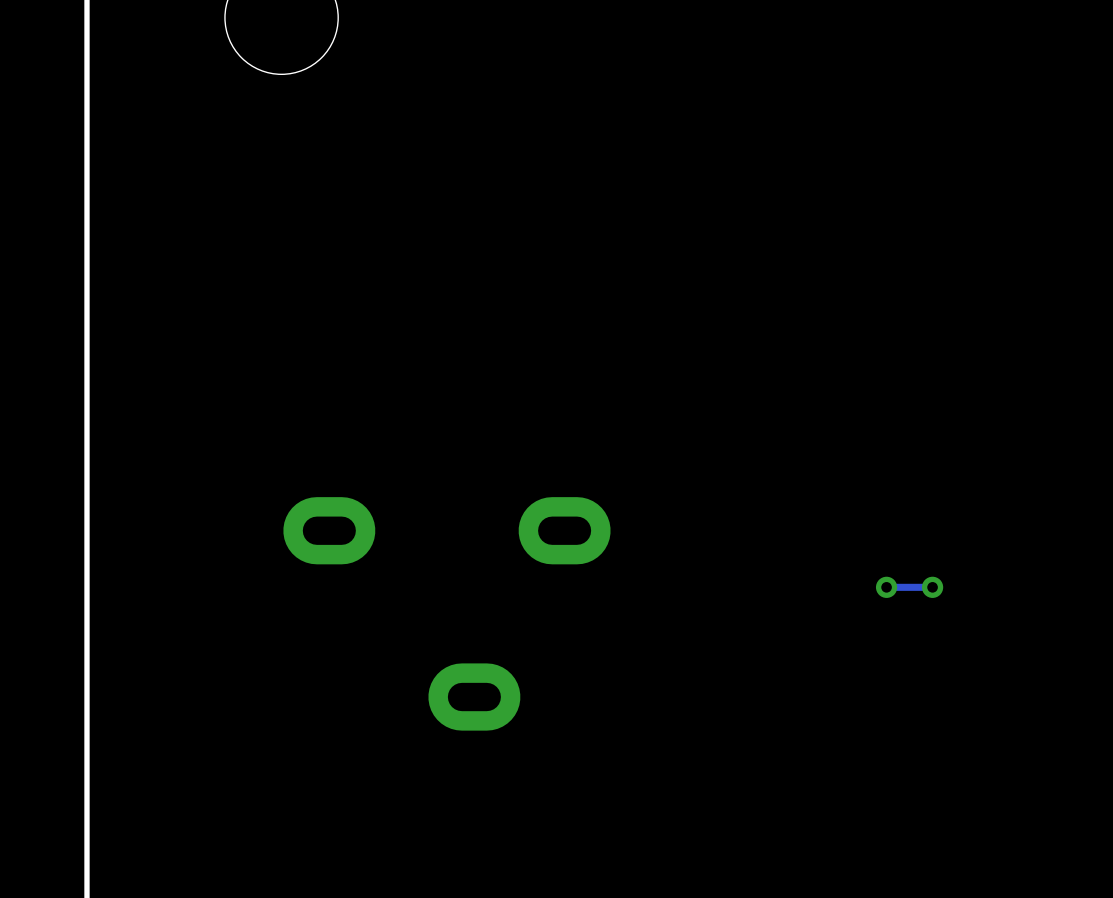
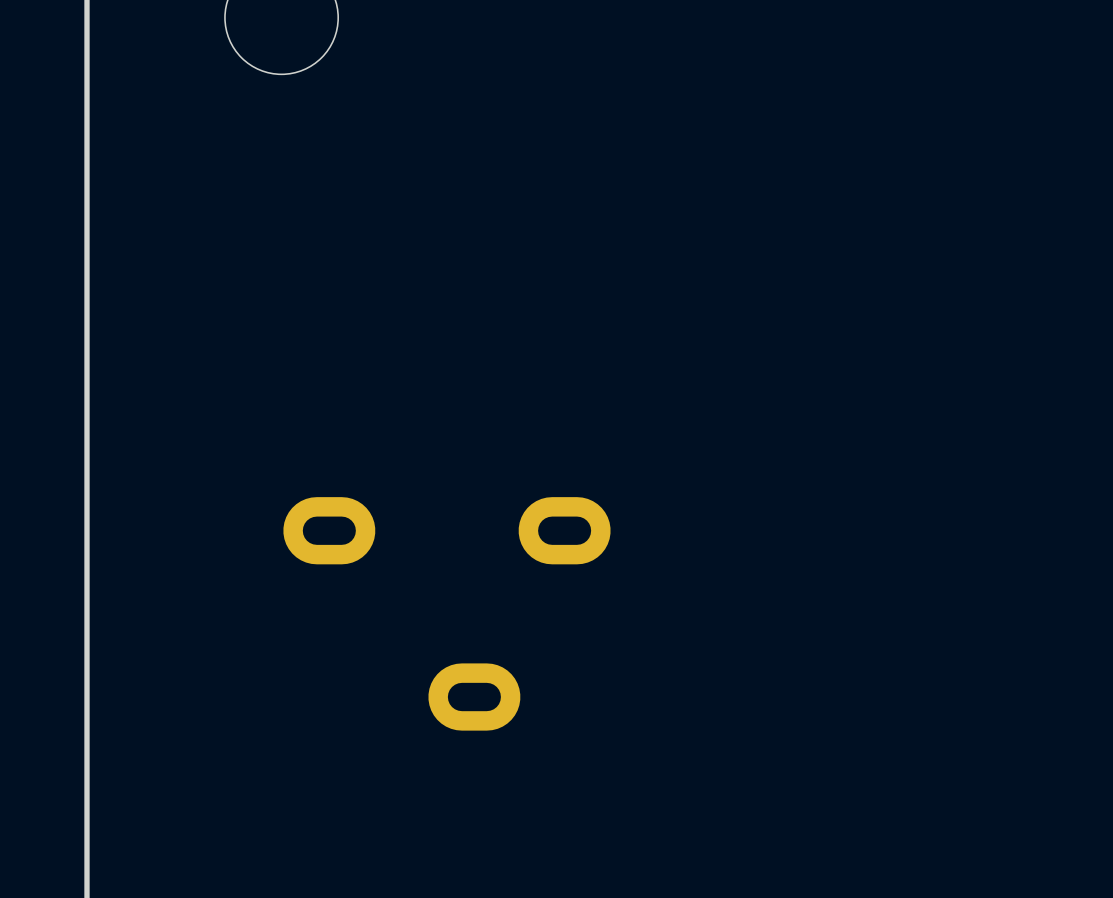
via: (886, 587) -> none
track: (932, 587) (886, 587) -> none
via: (932, 587) -> none

